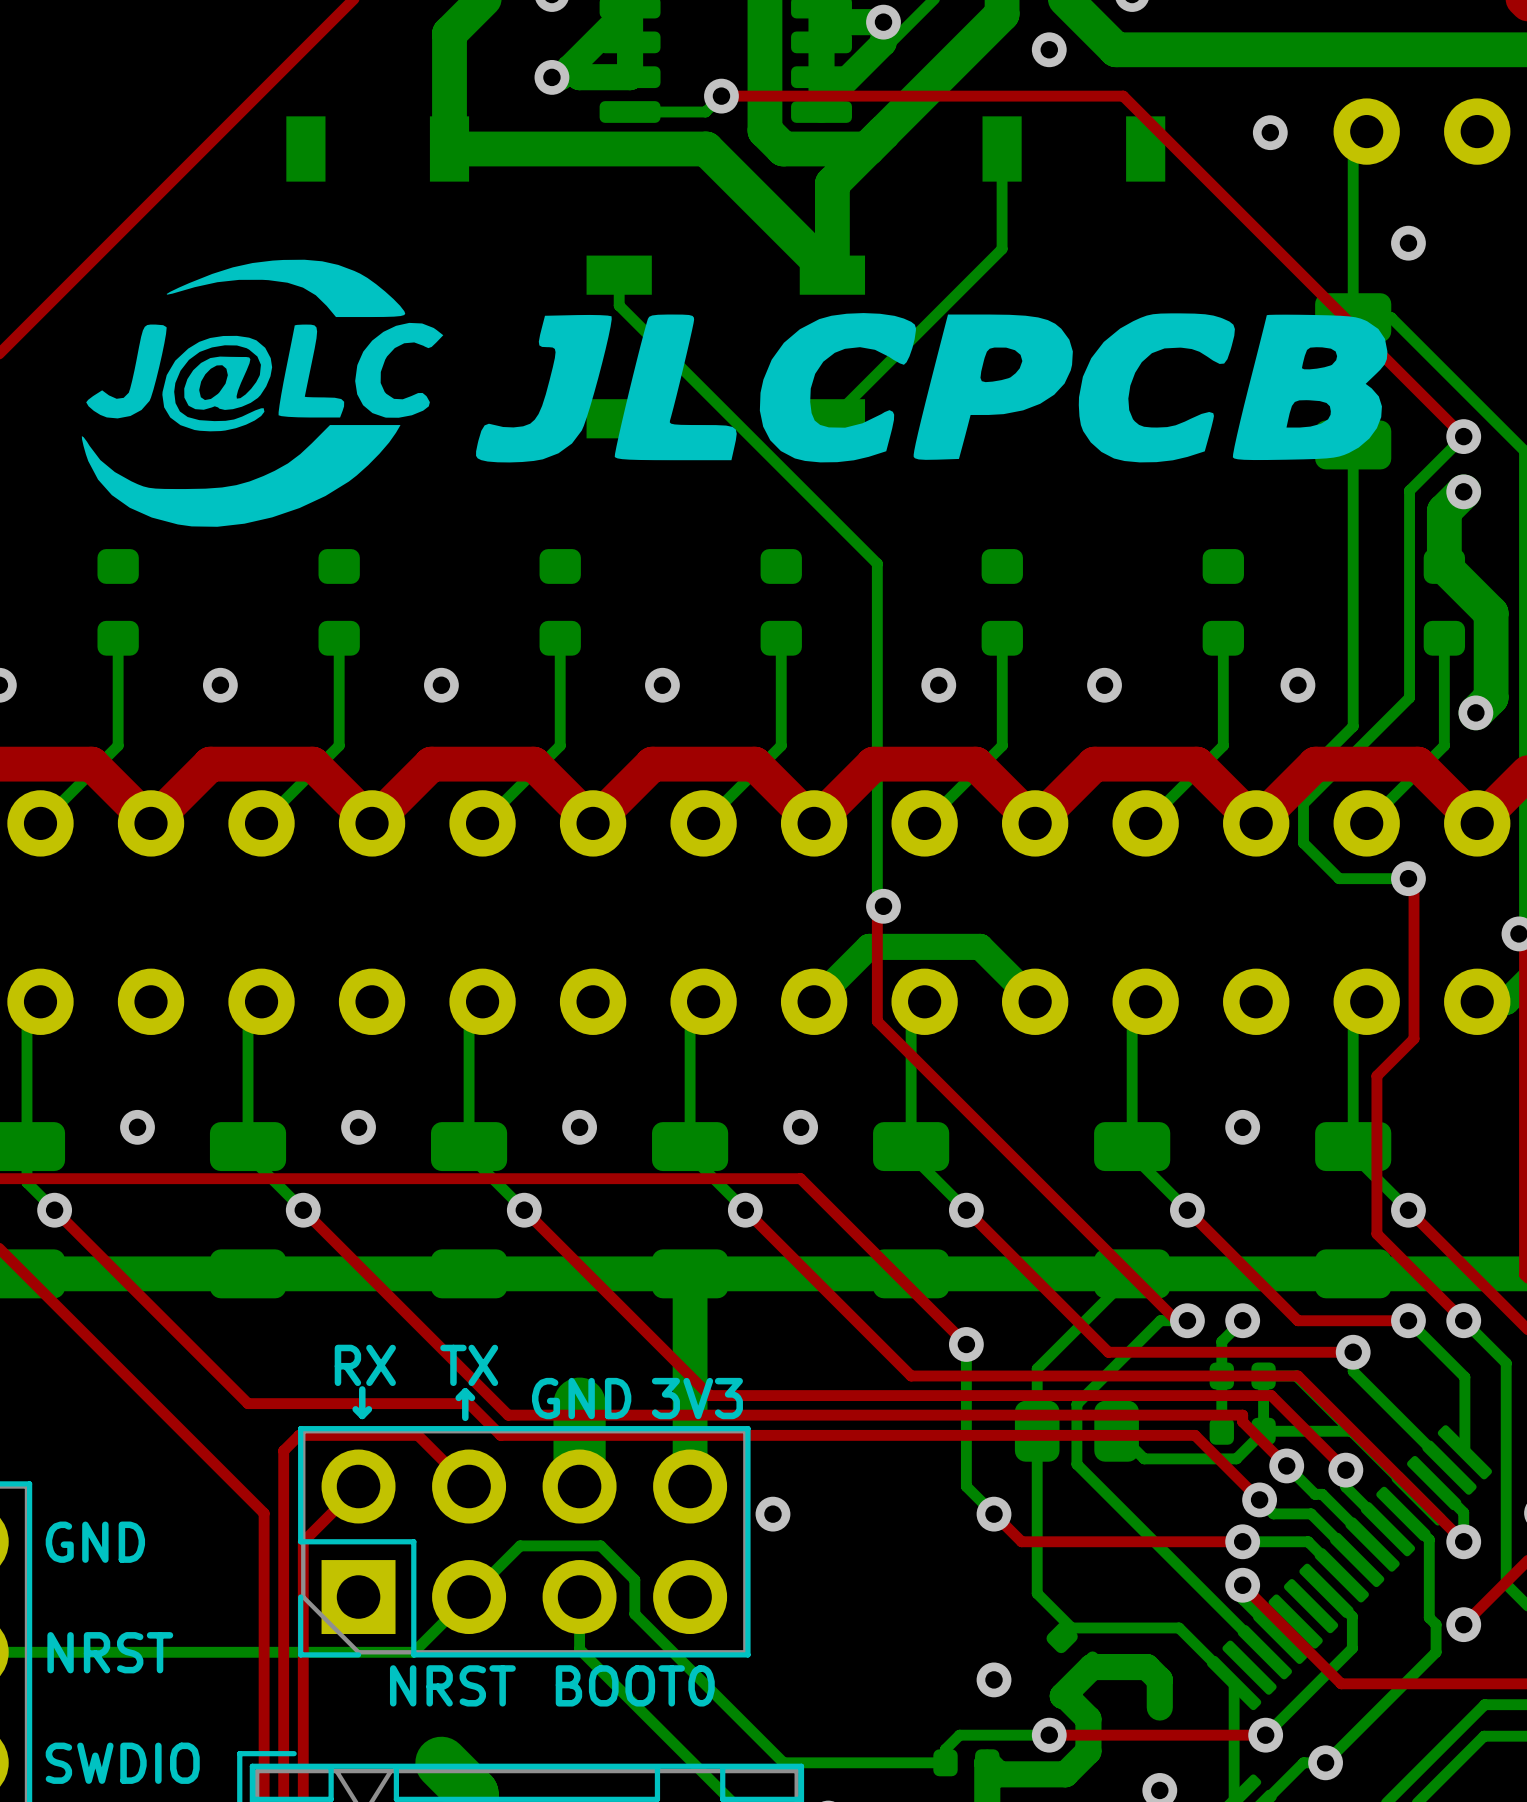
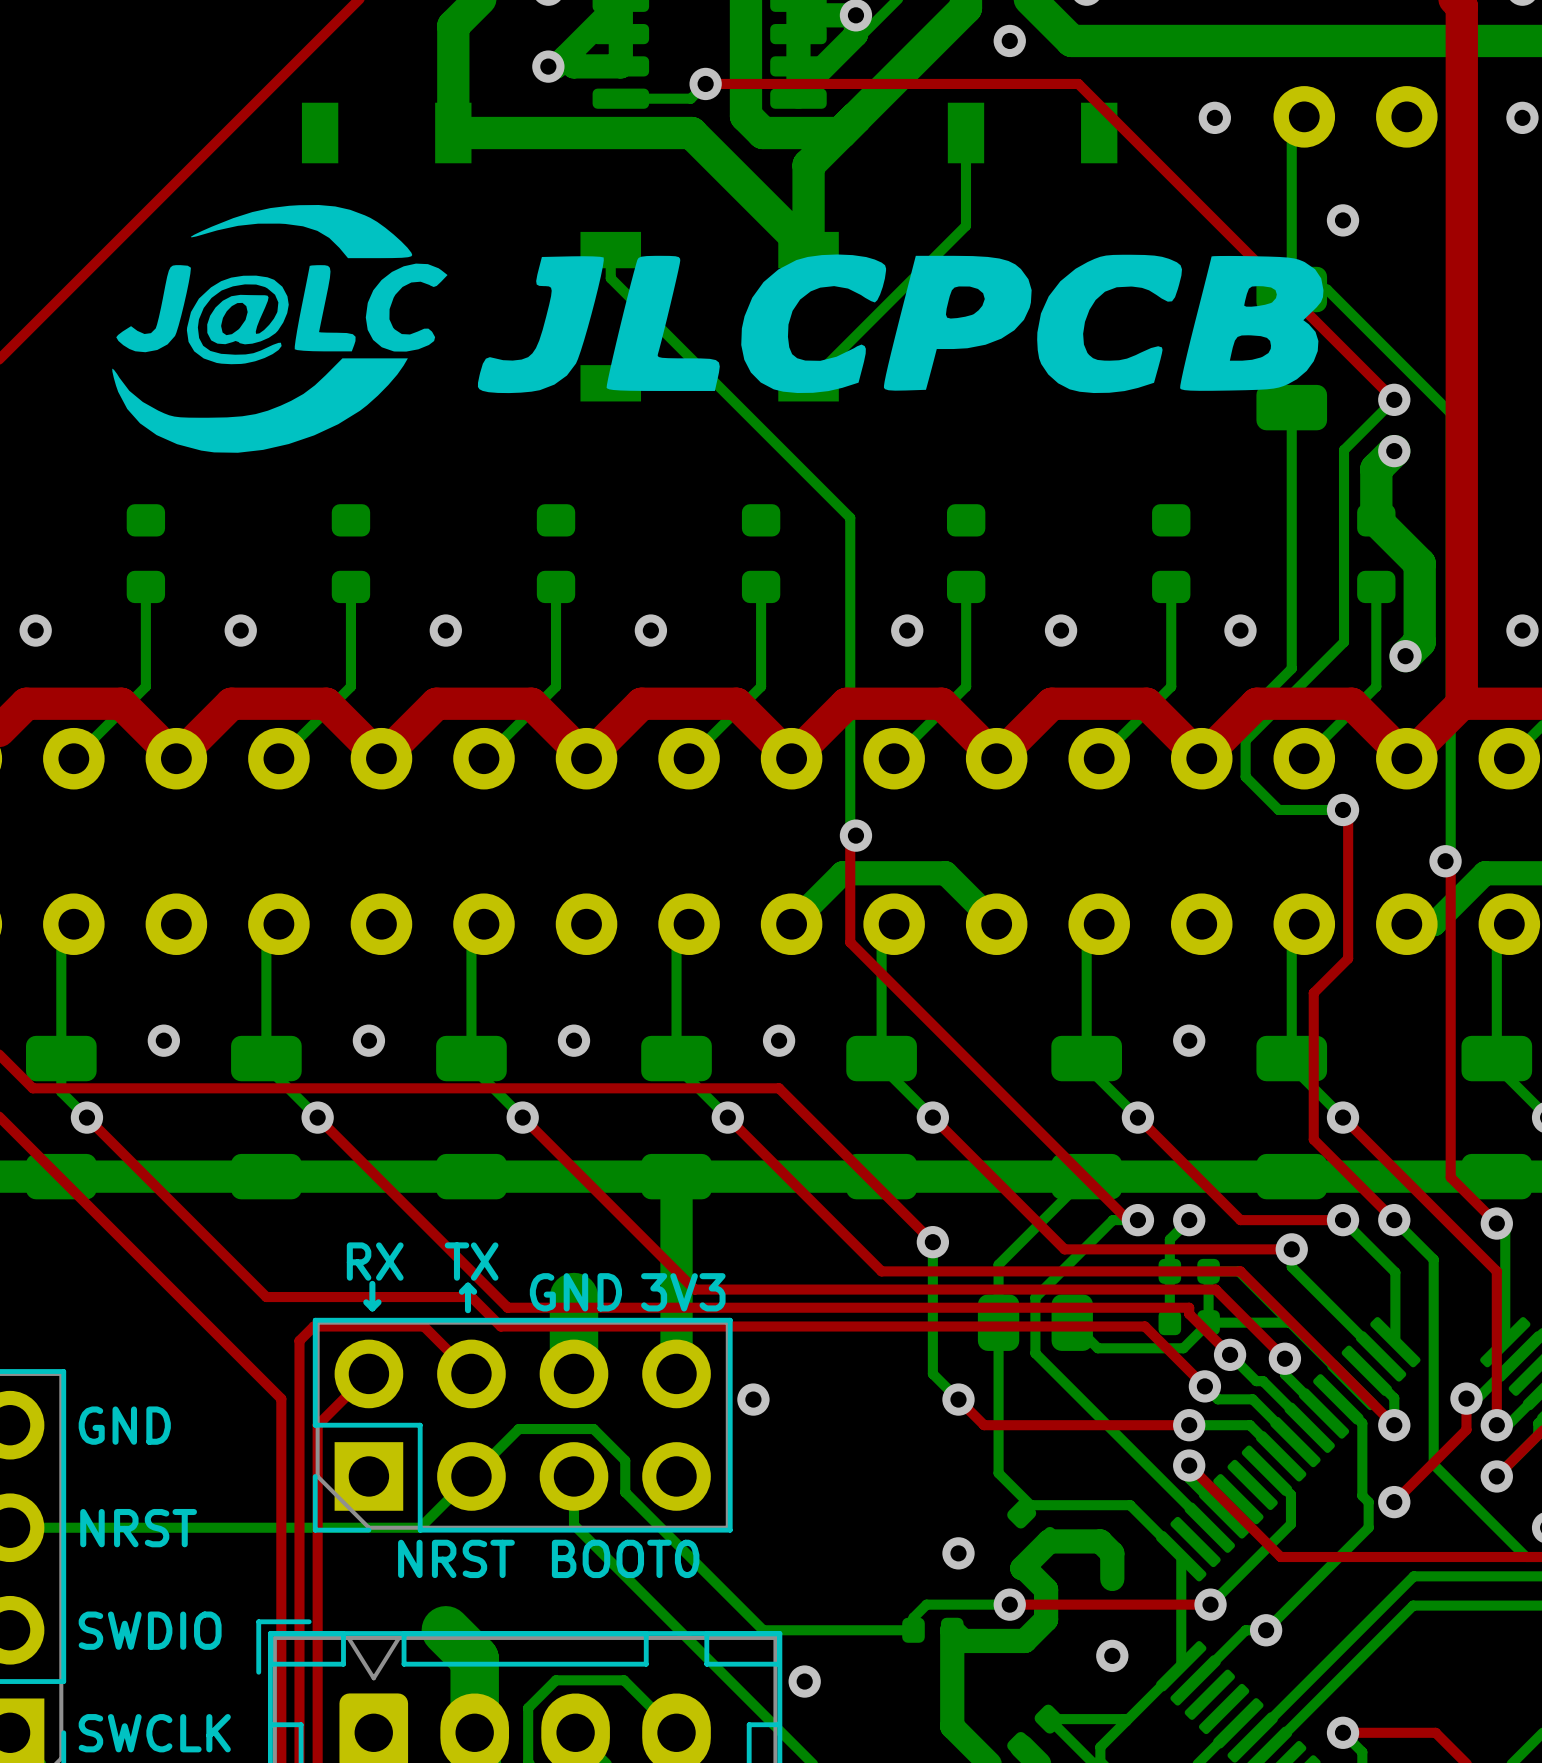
drawing position: (734, 393) -> (717, 328)

